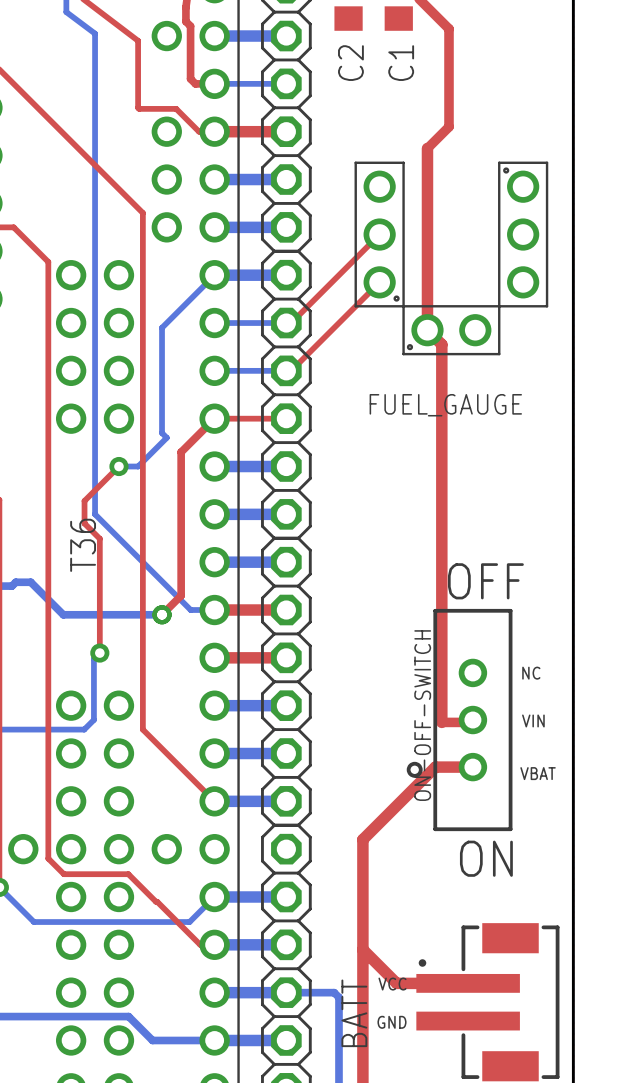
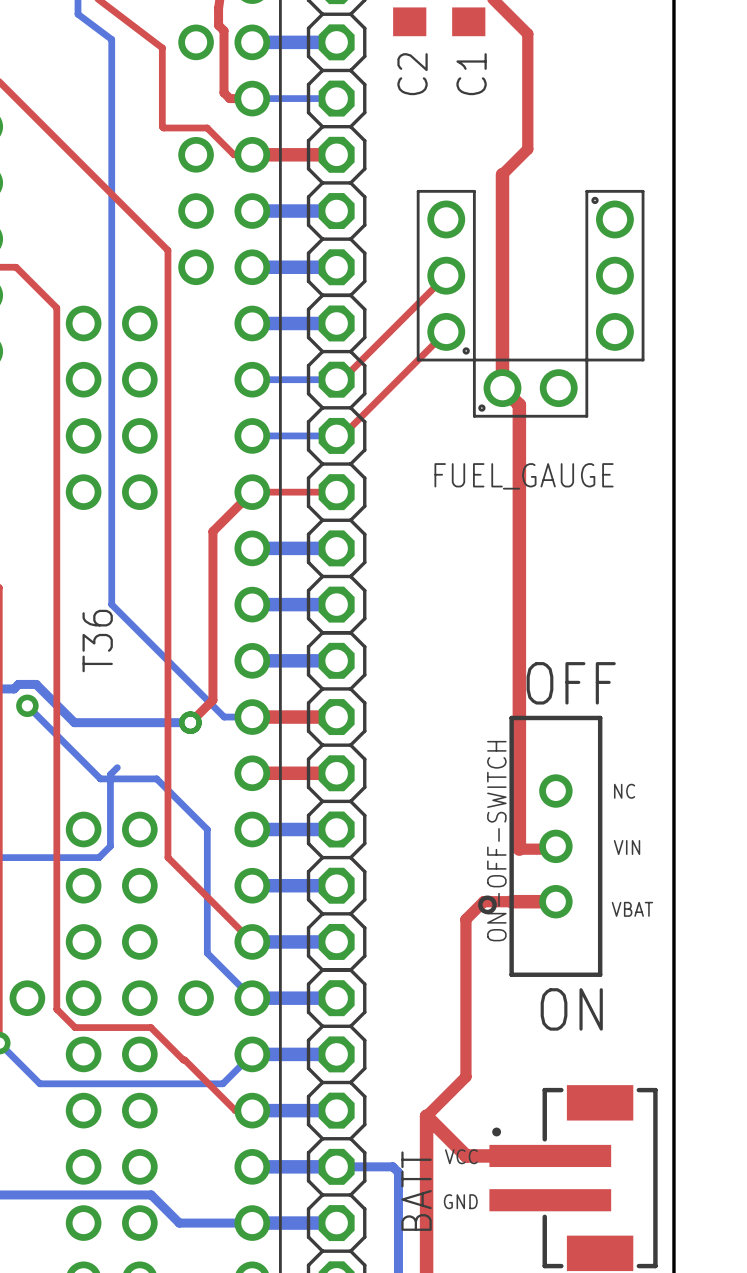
bottom track: (214, 275) (162, 327) (162, 433) (166, 437) (138, 466) (118, 466) -> none
top track: (118, 466) (84, 500) (84, 523) (99, 538) (99, 653) -> none
via: (118, 466) -> none
bottom track: none -> (27, 705) (100, 778) (156, 778) (207, 829) (207, 953) (252, 998) (336, 998)
via: none -> (27, 705)
via: (99, 653) -> none
top track: (435, 767) (362, 839) (362, 949) -> (511, 901) (483, 901) (465, 919) (465, 1076) (426, 1116)

